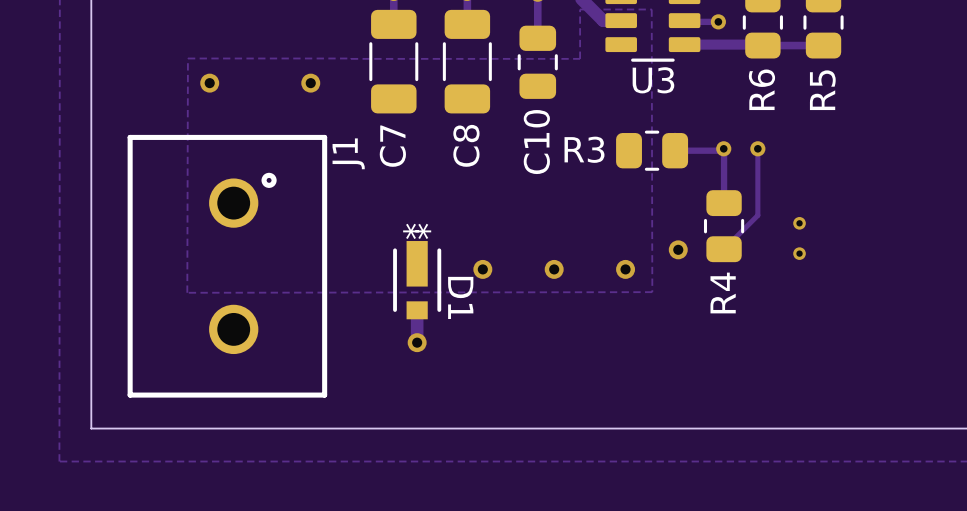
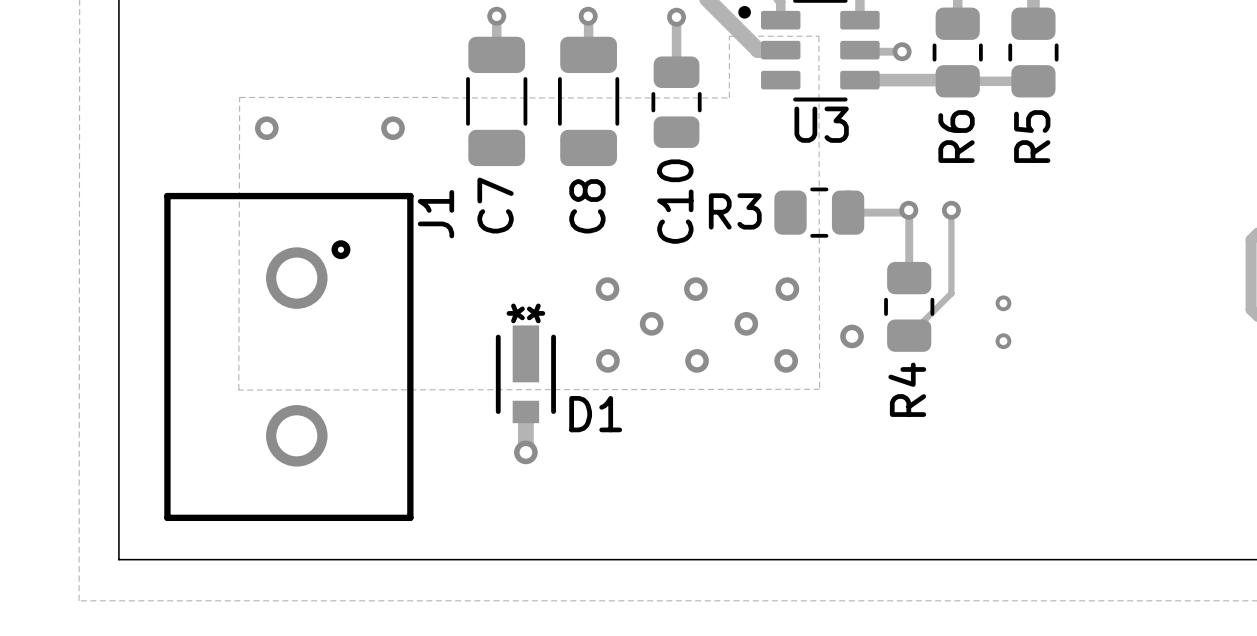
via: none -> (607, 289)
via: none -> (695, 289)
via: none -> (787, 289)
via: none -> (651, 323)
via: none -> (746, 323)
D1 name rotation: 0° (460, 297) -> 90° counterclockwise (595, 414)

